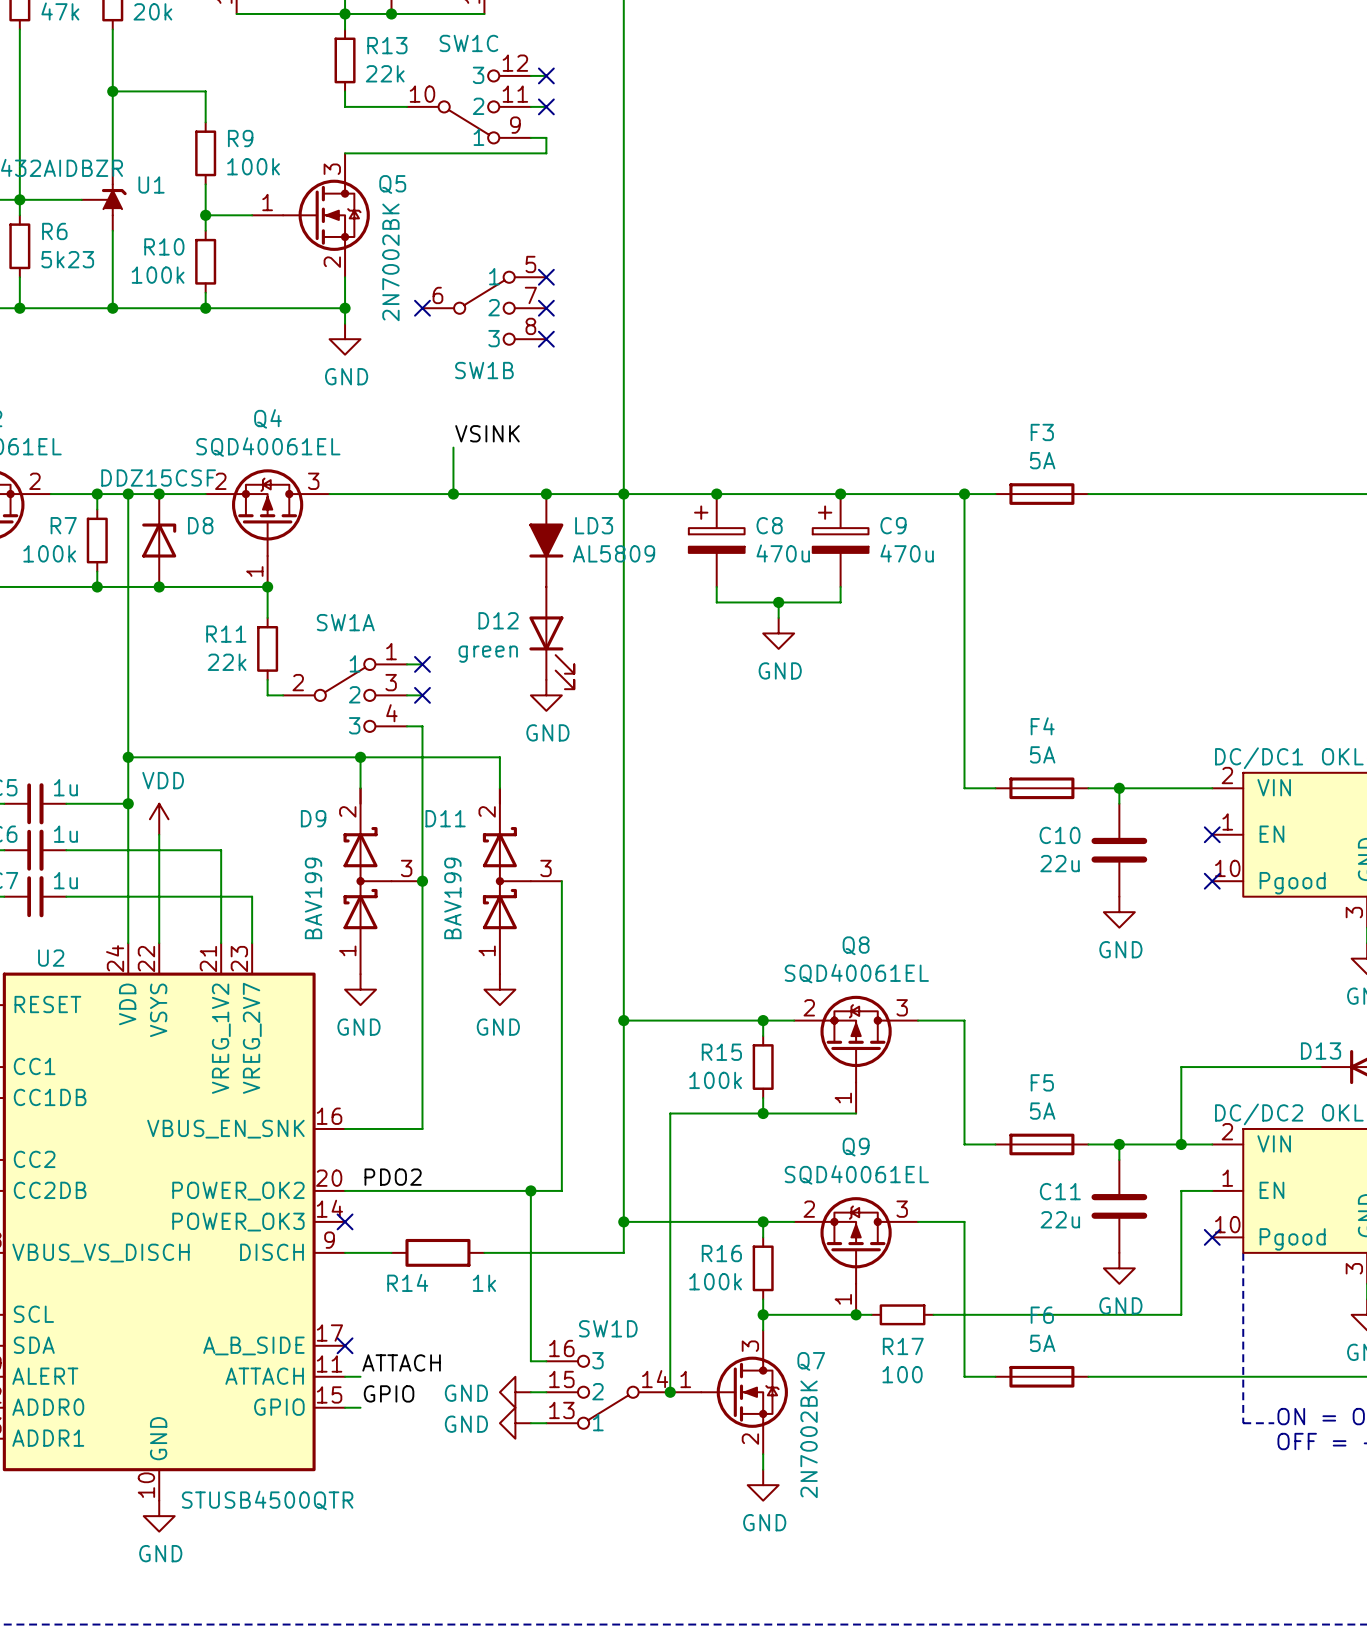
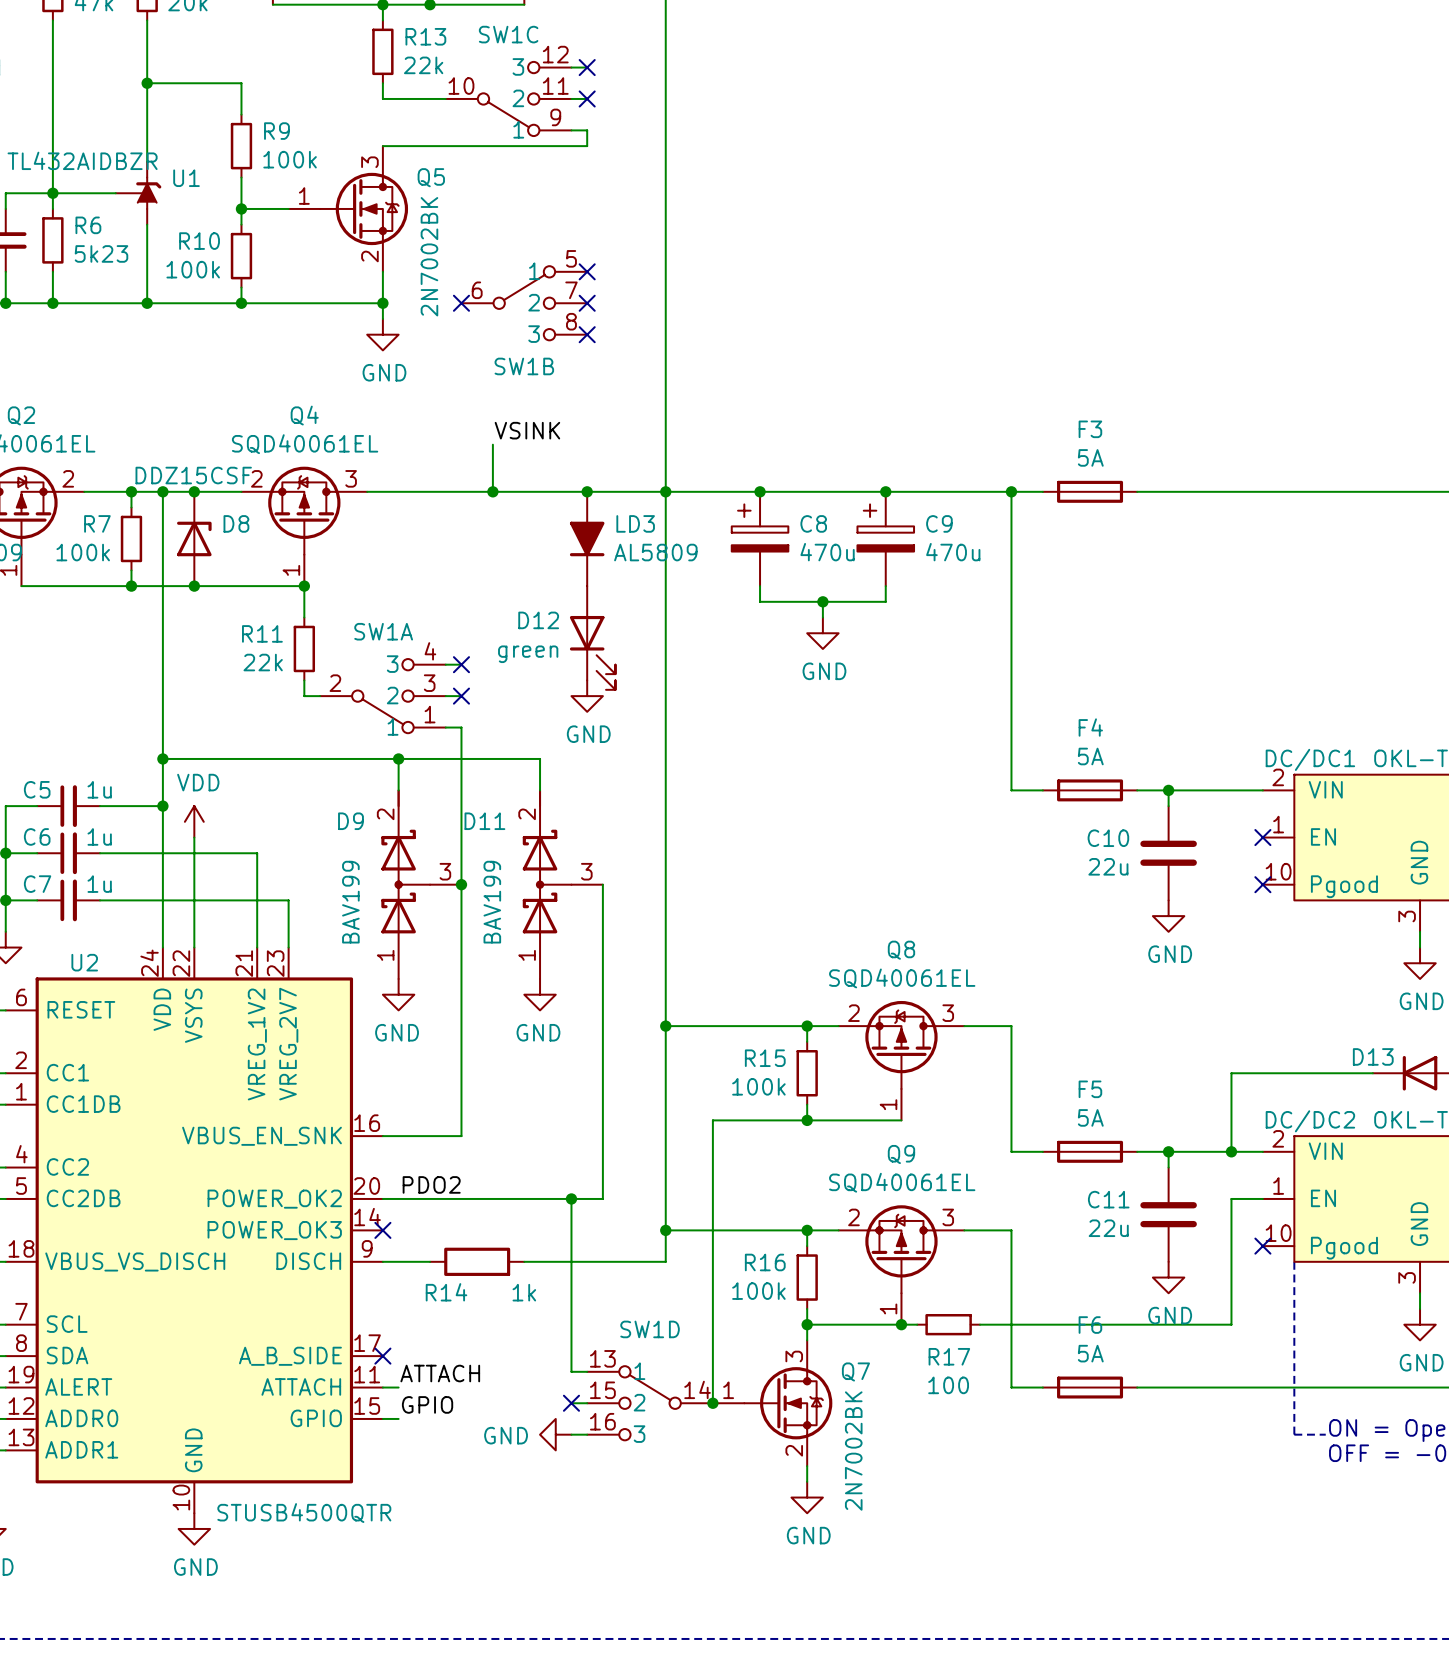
SW1A flip: as is (345, 695) -> up-down (382, 696)
power symbol: GND (515, 1392) -> none
no-connect mark: none -> (571, 1403)
SW1D flip: as is (608, 1392) -> up-down (650, 1403)

